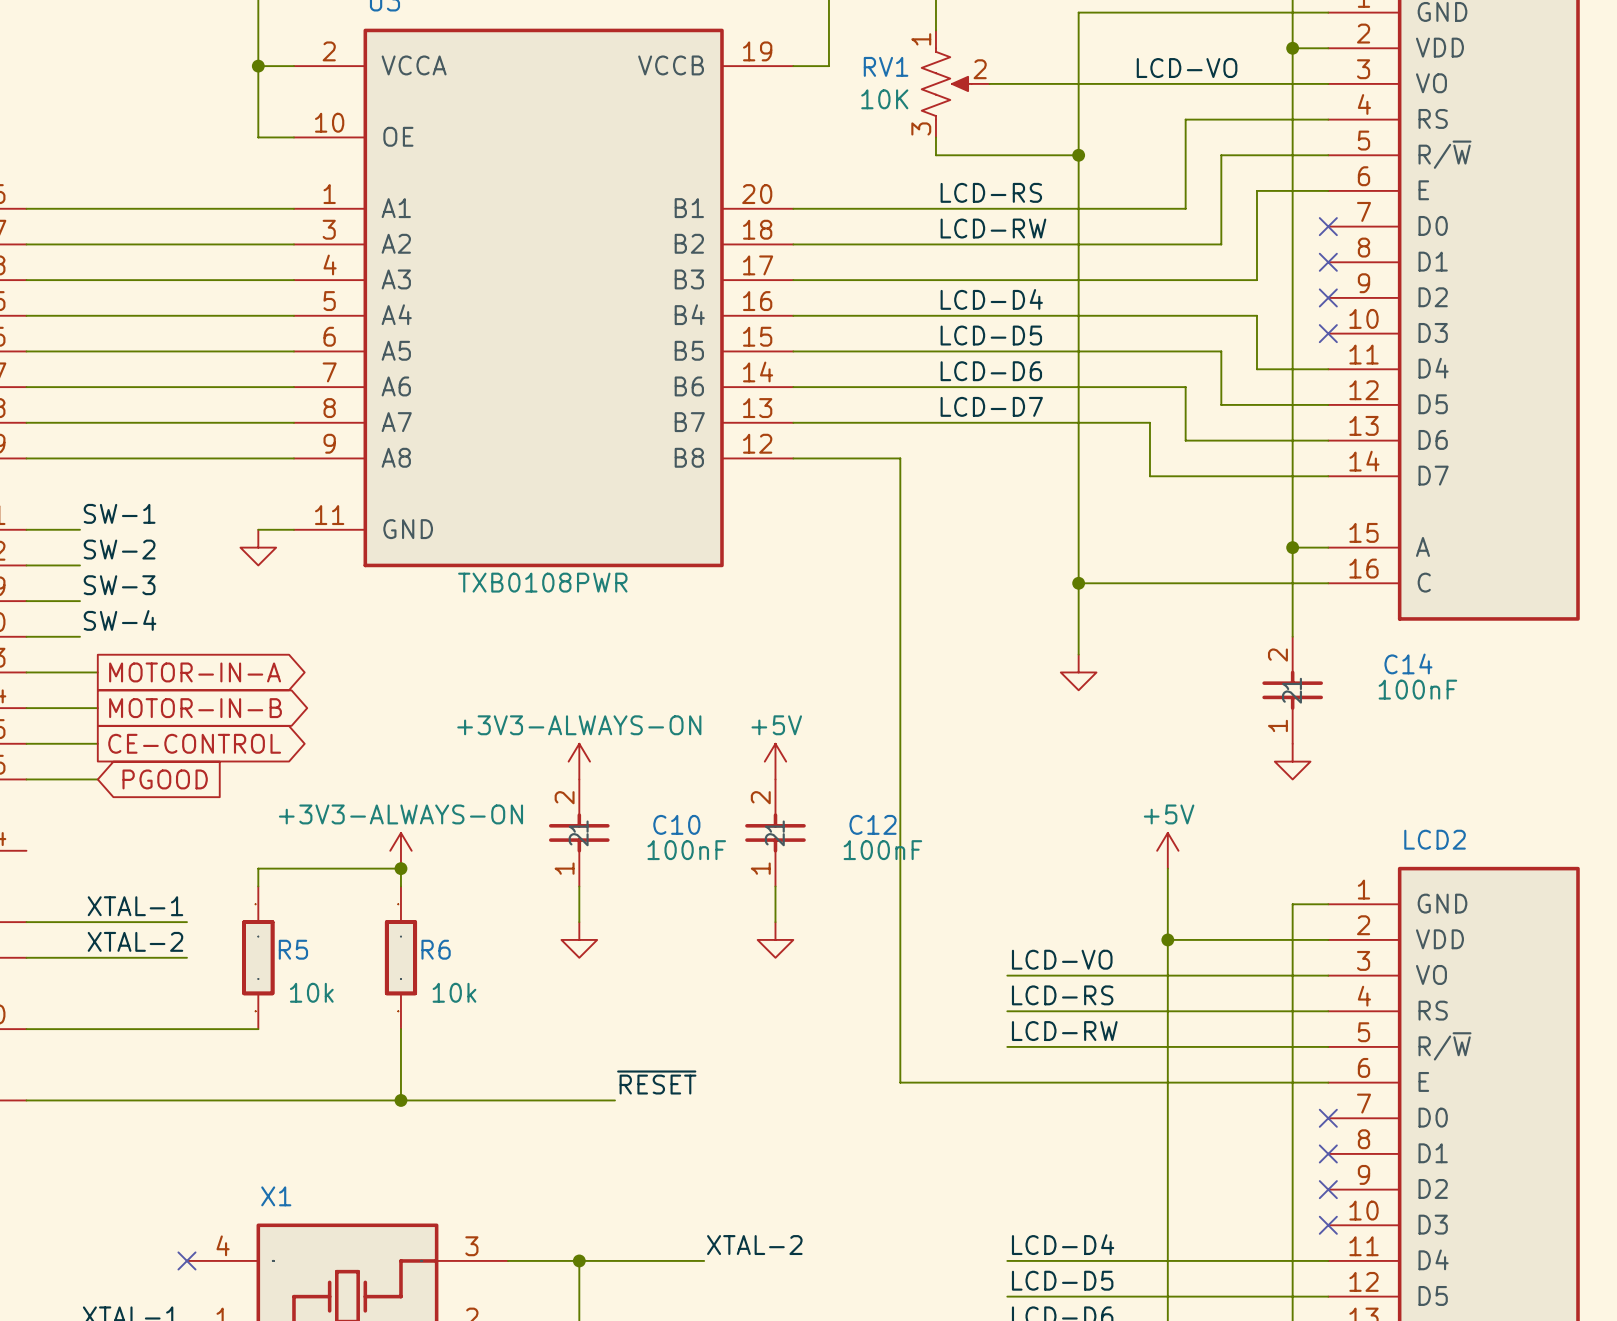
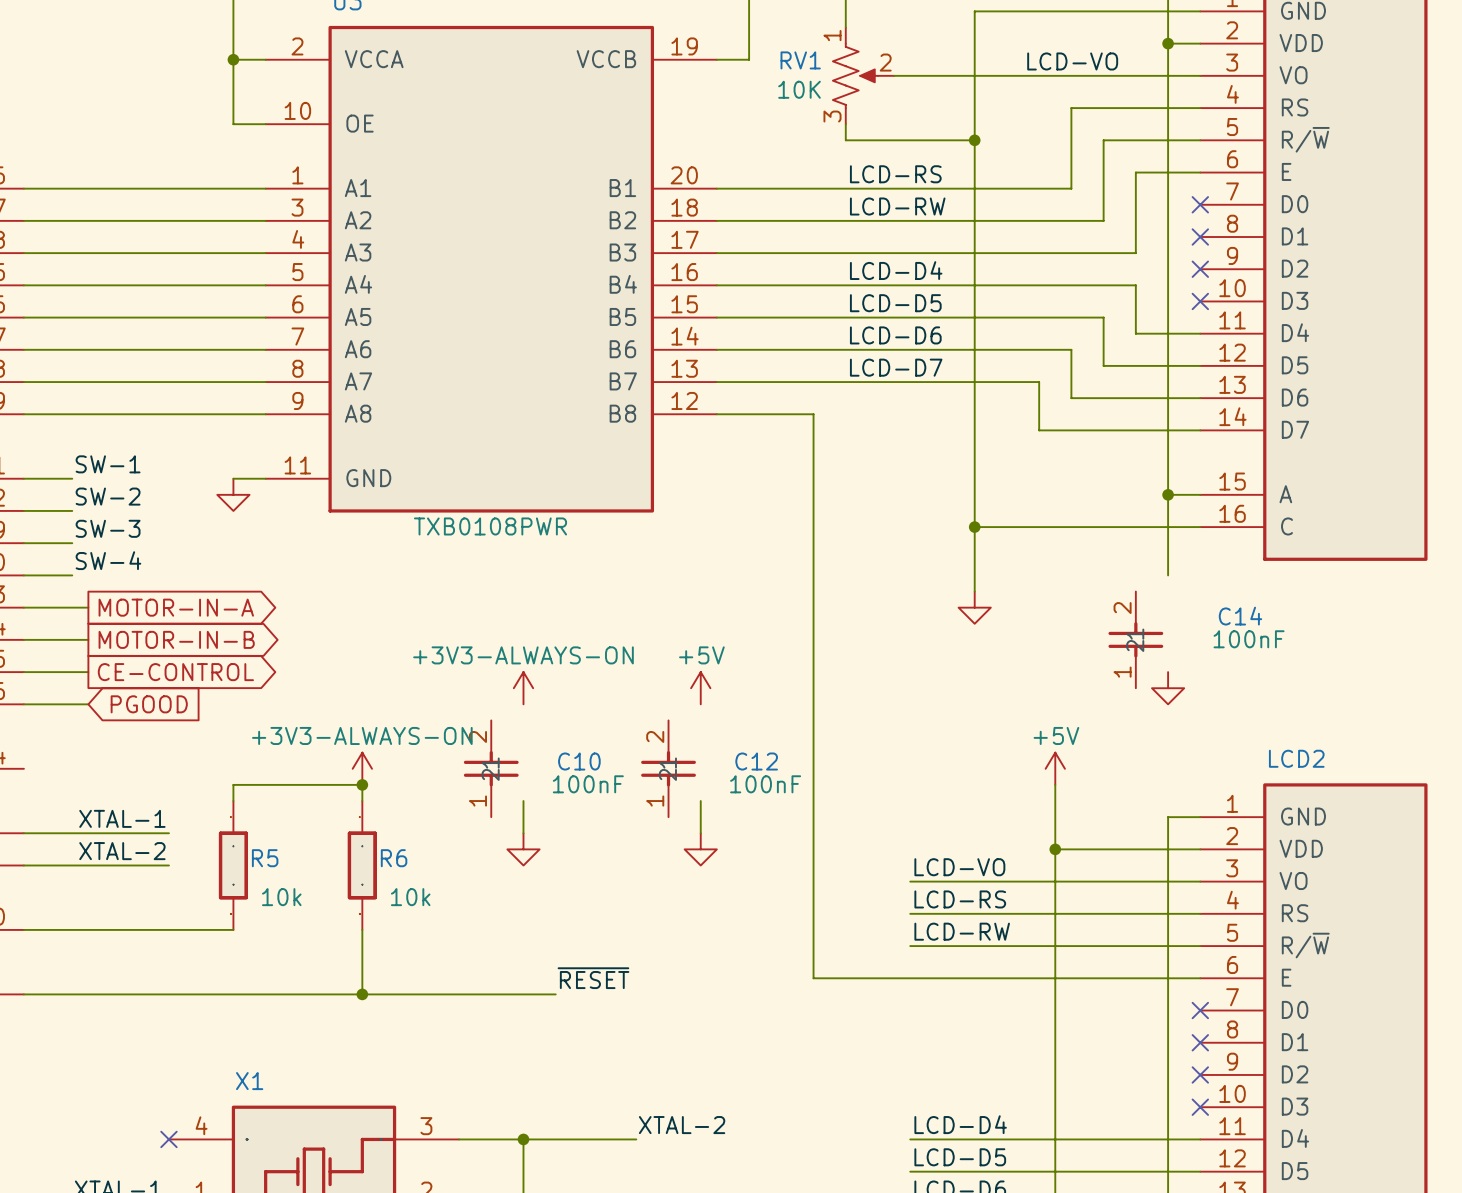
C14 position: (1292, 690) -> (1135, 639)
C10 position: (579, 832) -> (491, 768)
C12 position: (775, 832) -> (668, 768)

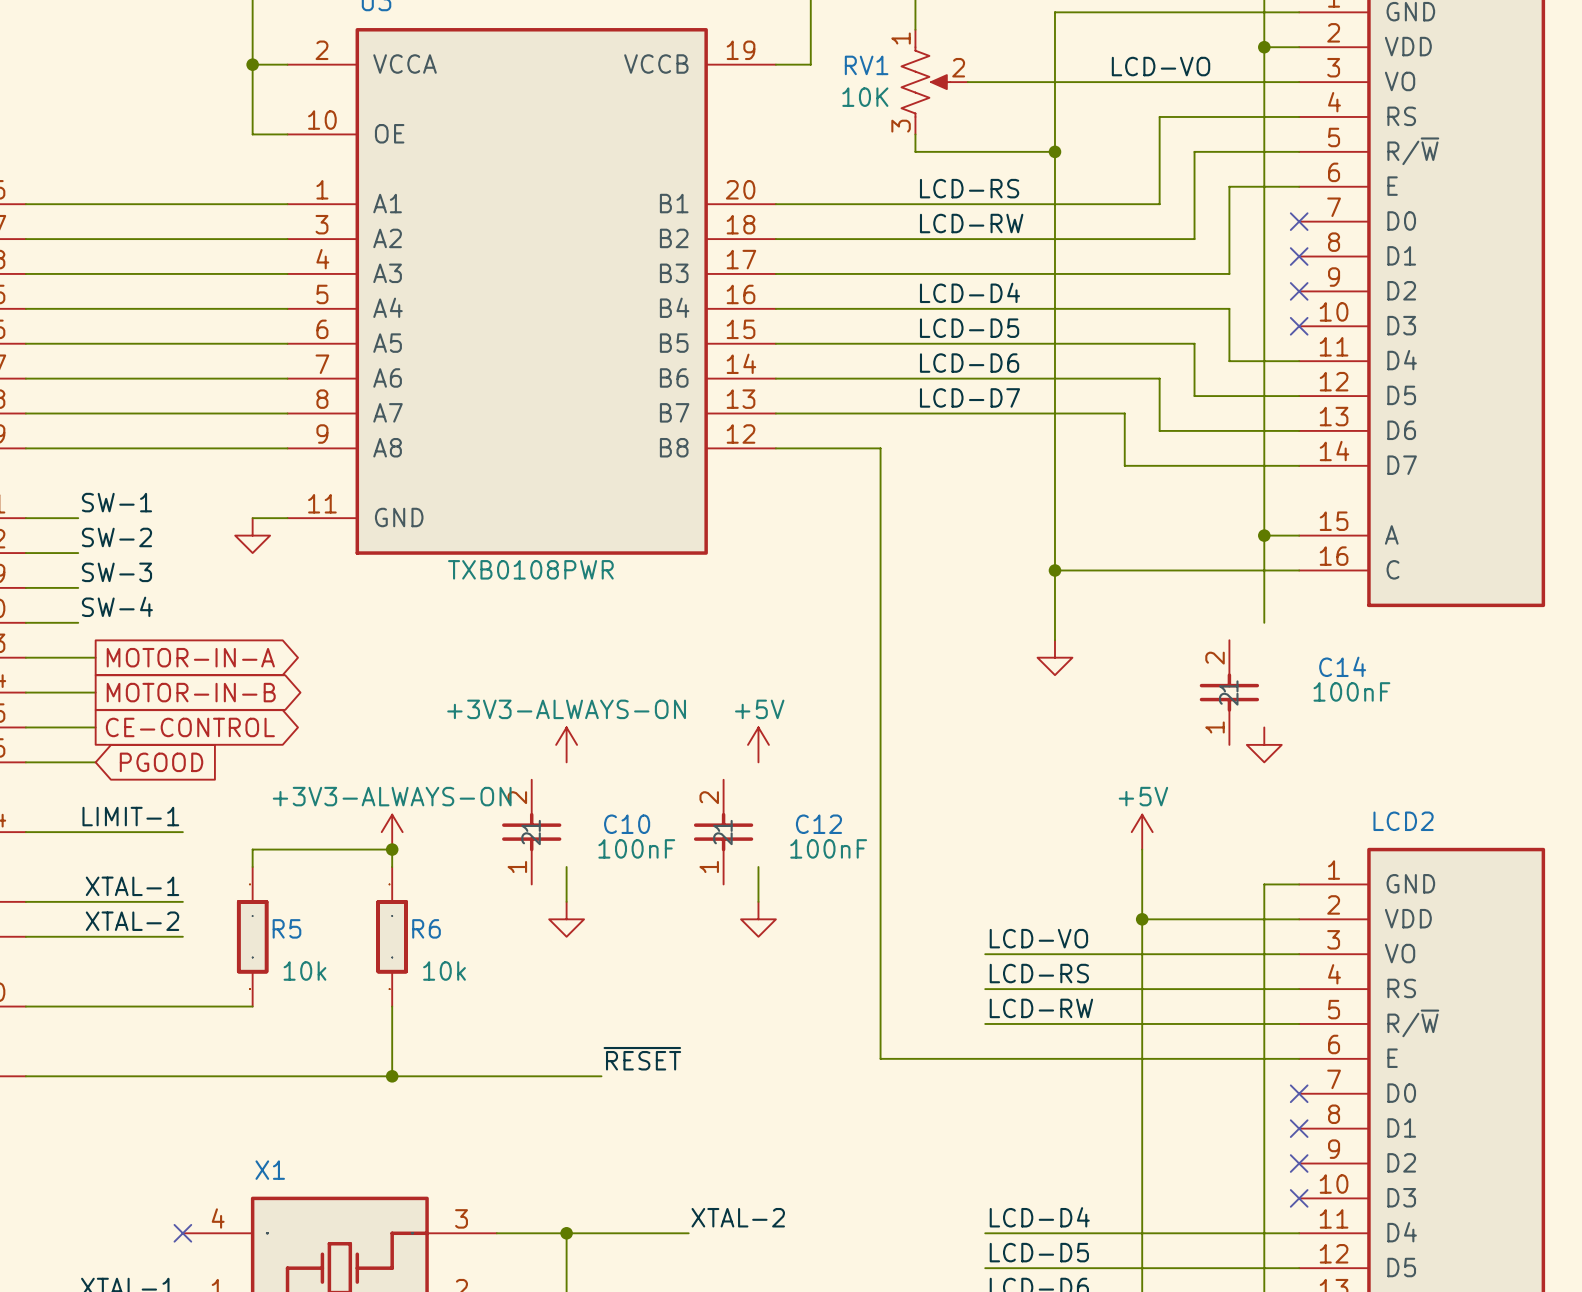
label: none -> LIMIT-1 (130, 816)
wire: none -> (25, 832) (182, 832)

